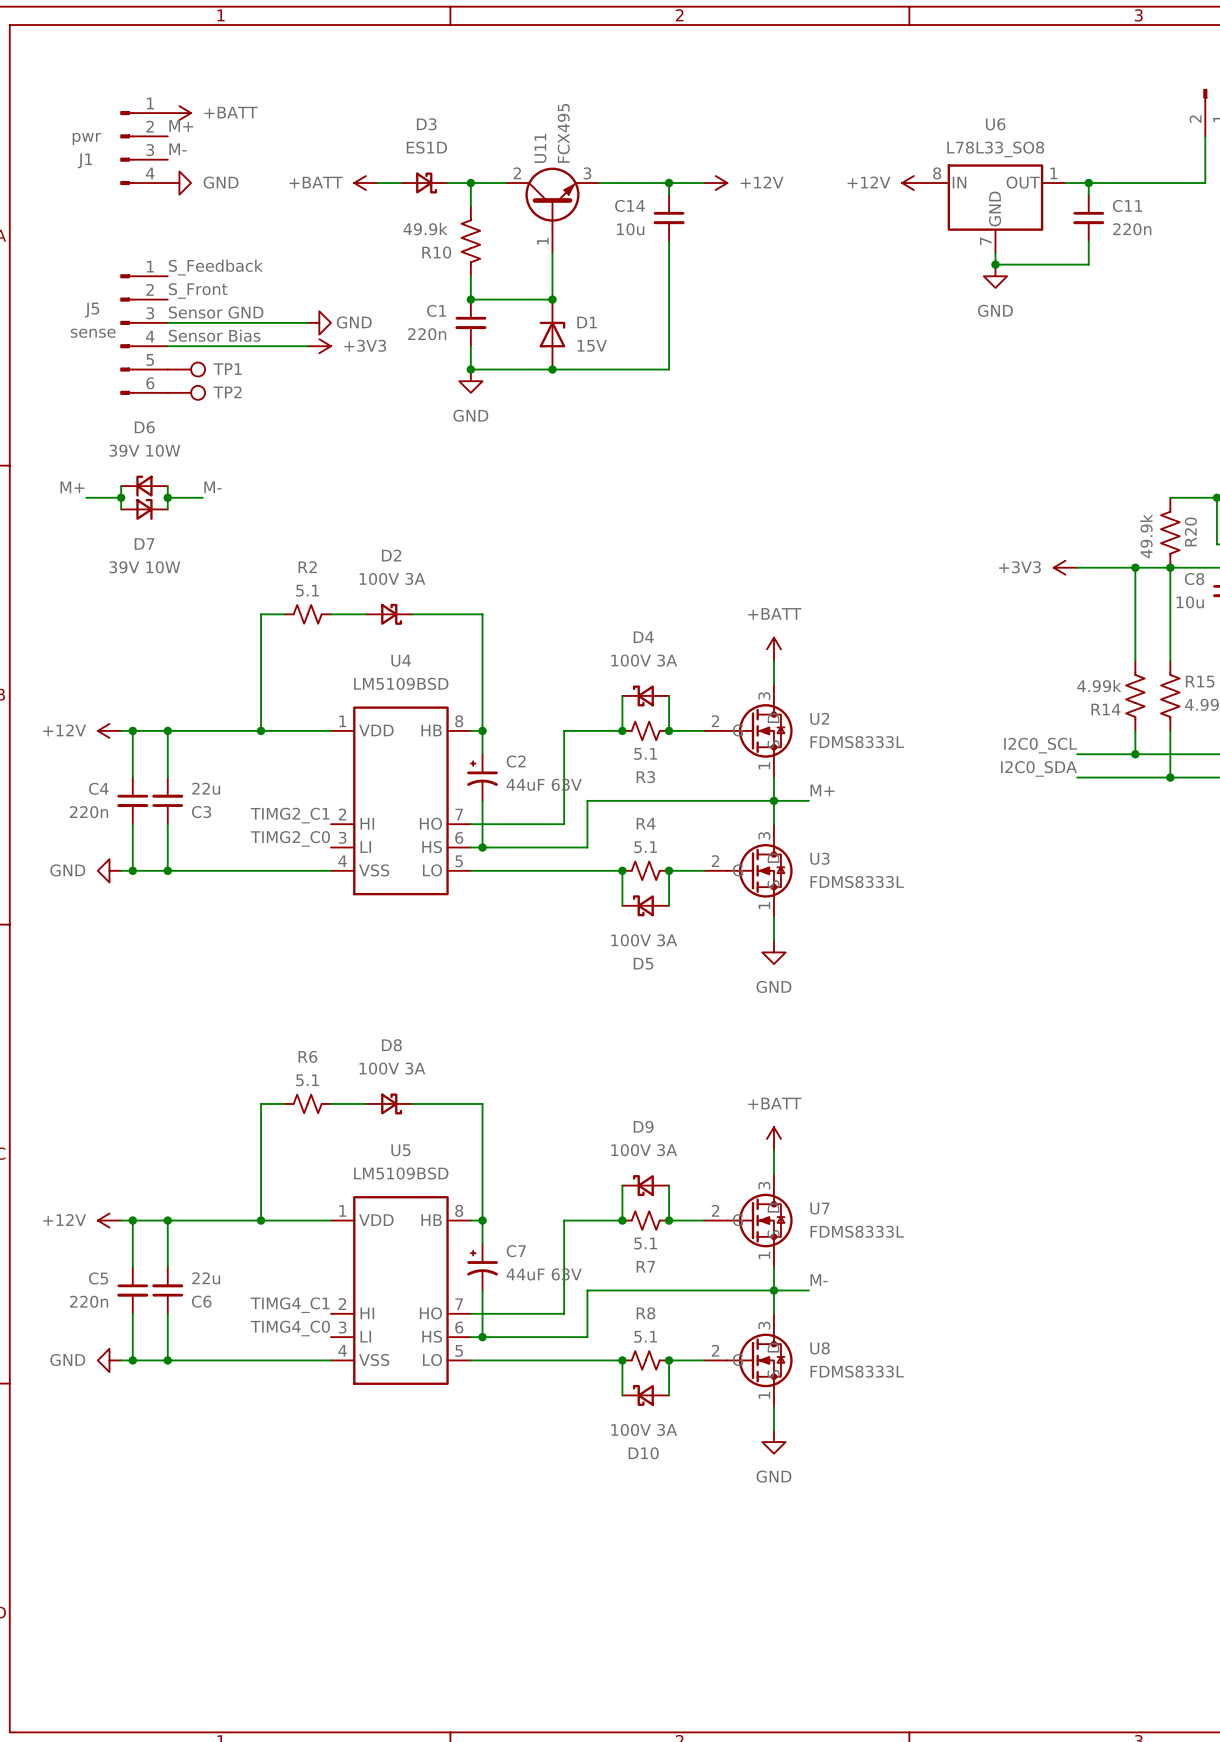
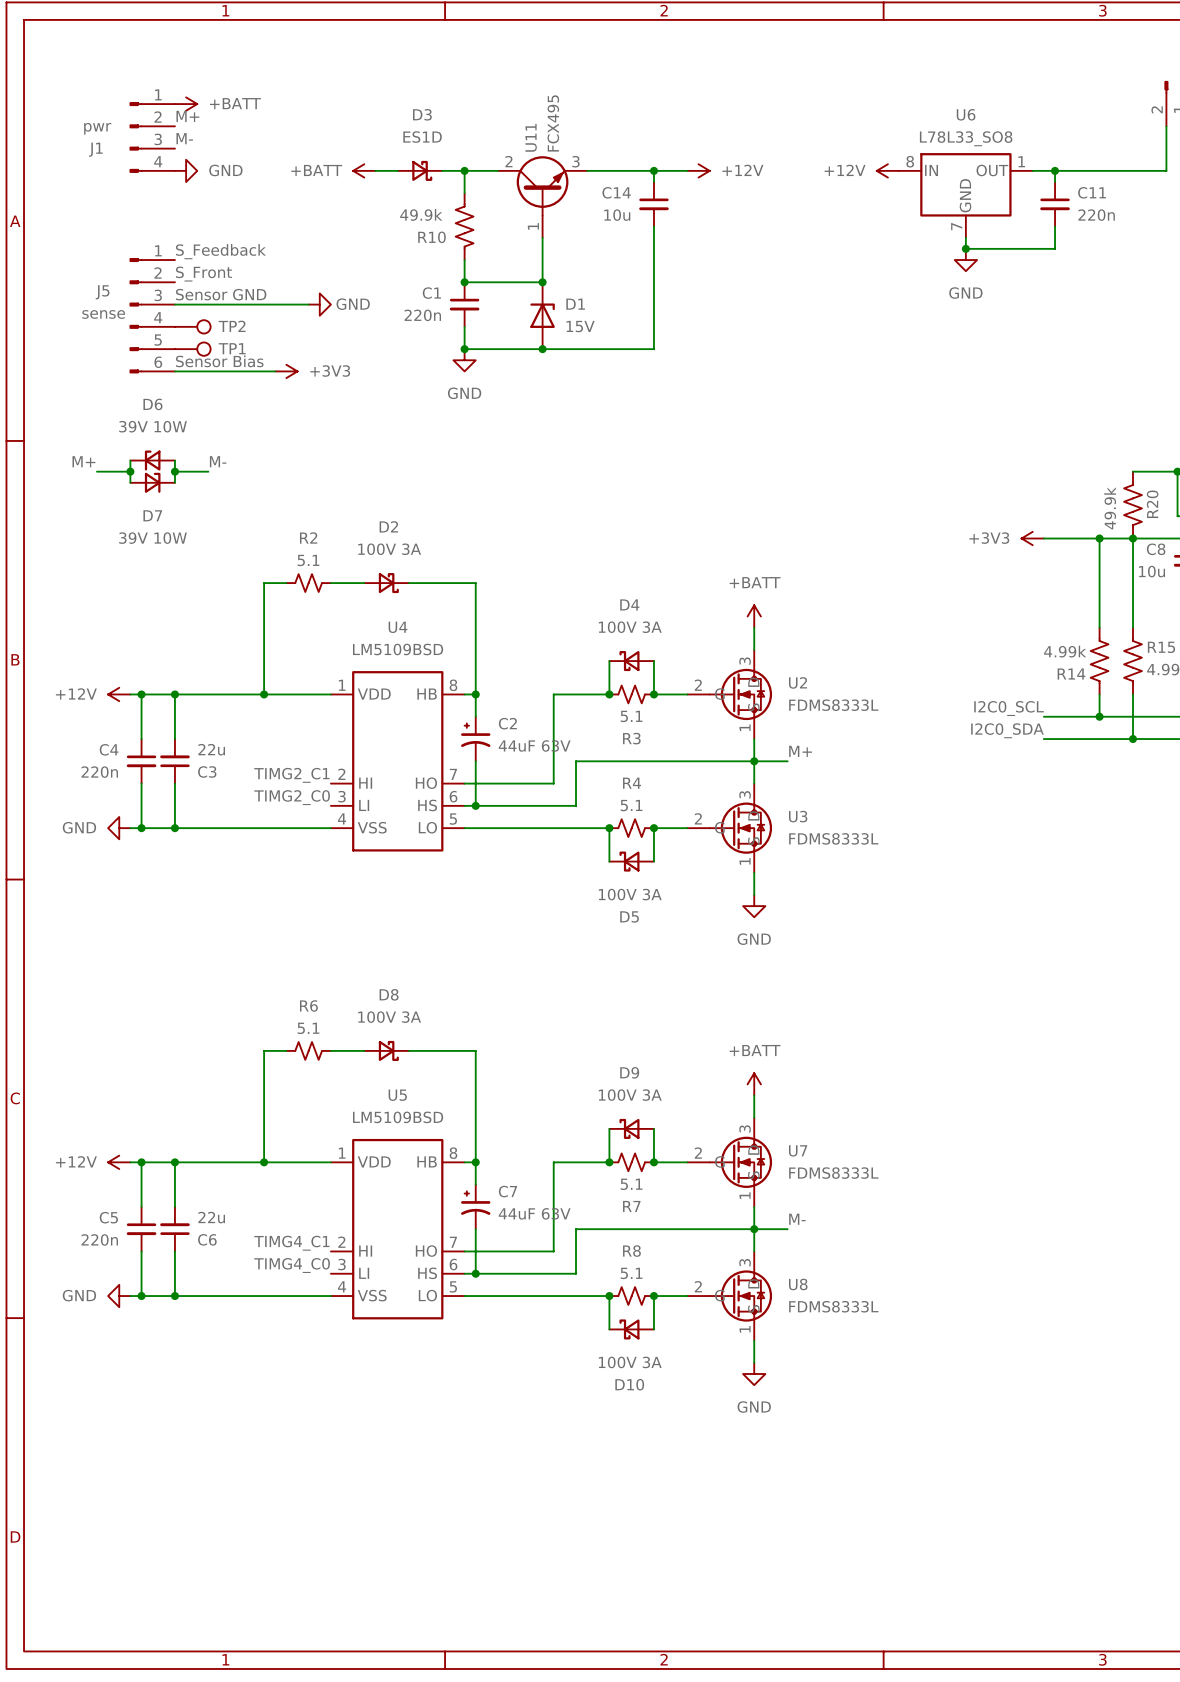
label position: Sensor Bias (214, 335) -> Sensor Bias (219, 361)
wire: (167, 346) (307, 346) -> none
power symbol position: +3V3 (319, 346) -> +3V3 (286, 371)
wire: none -> (174, 371) (275, 371)
TP2 position: (186, 392) -> (192, 326)

